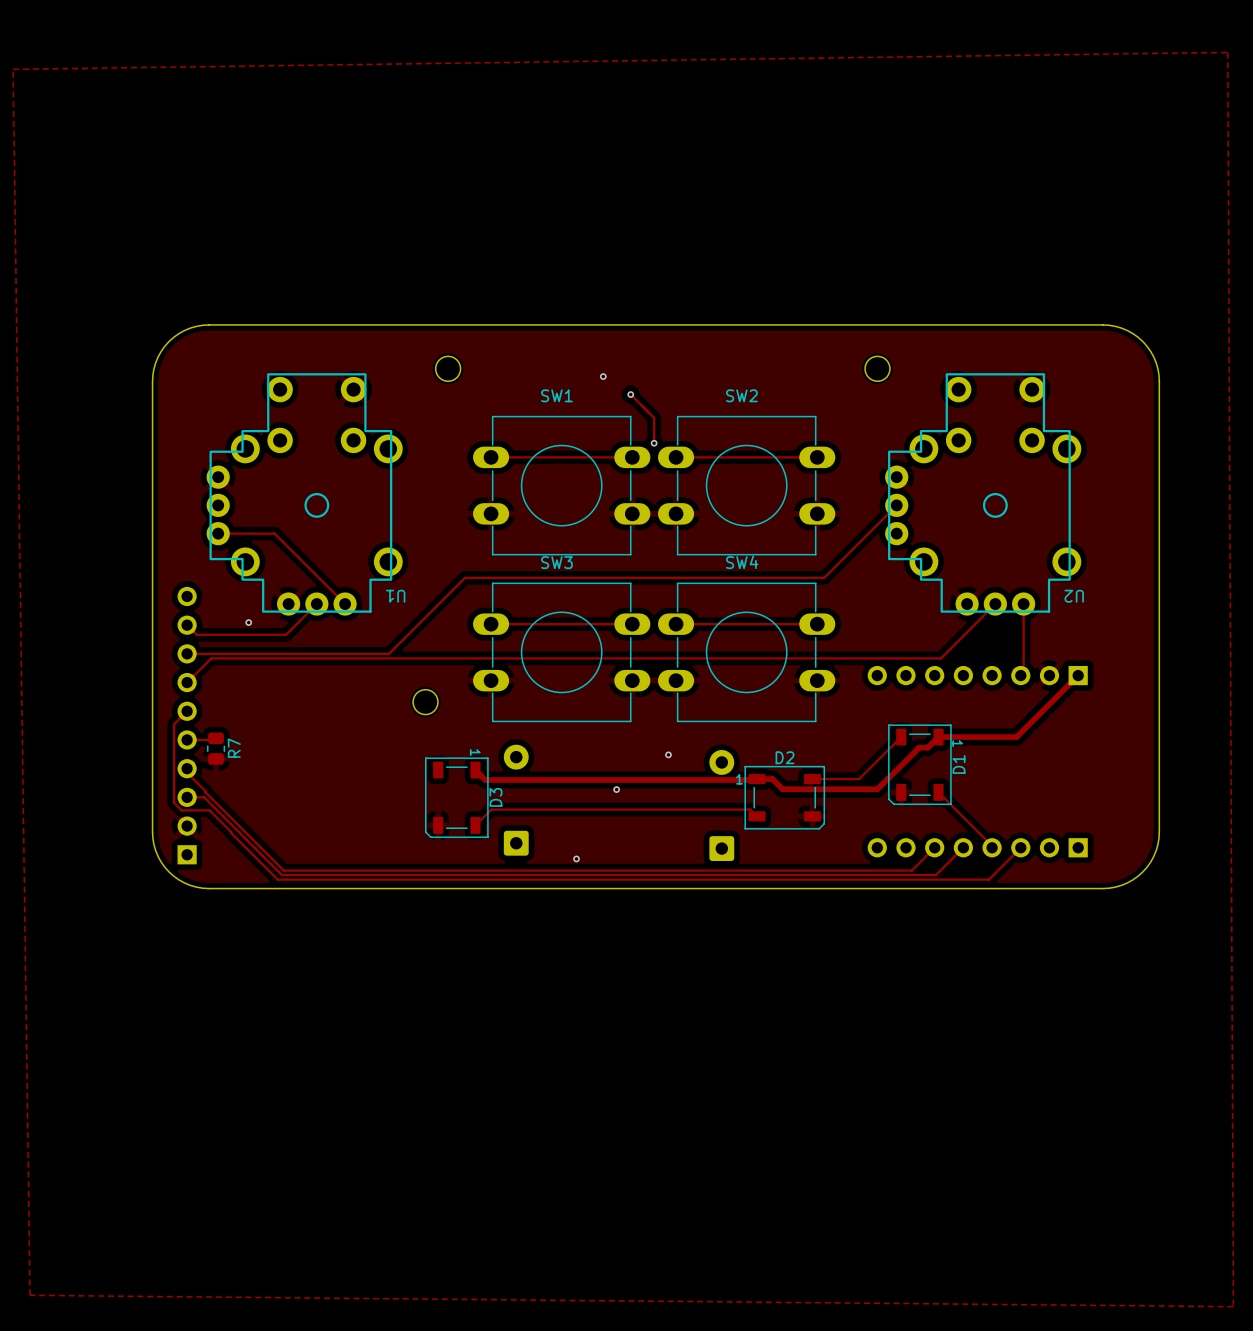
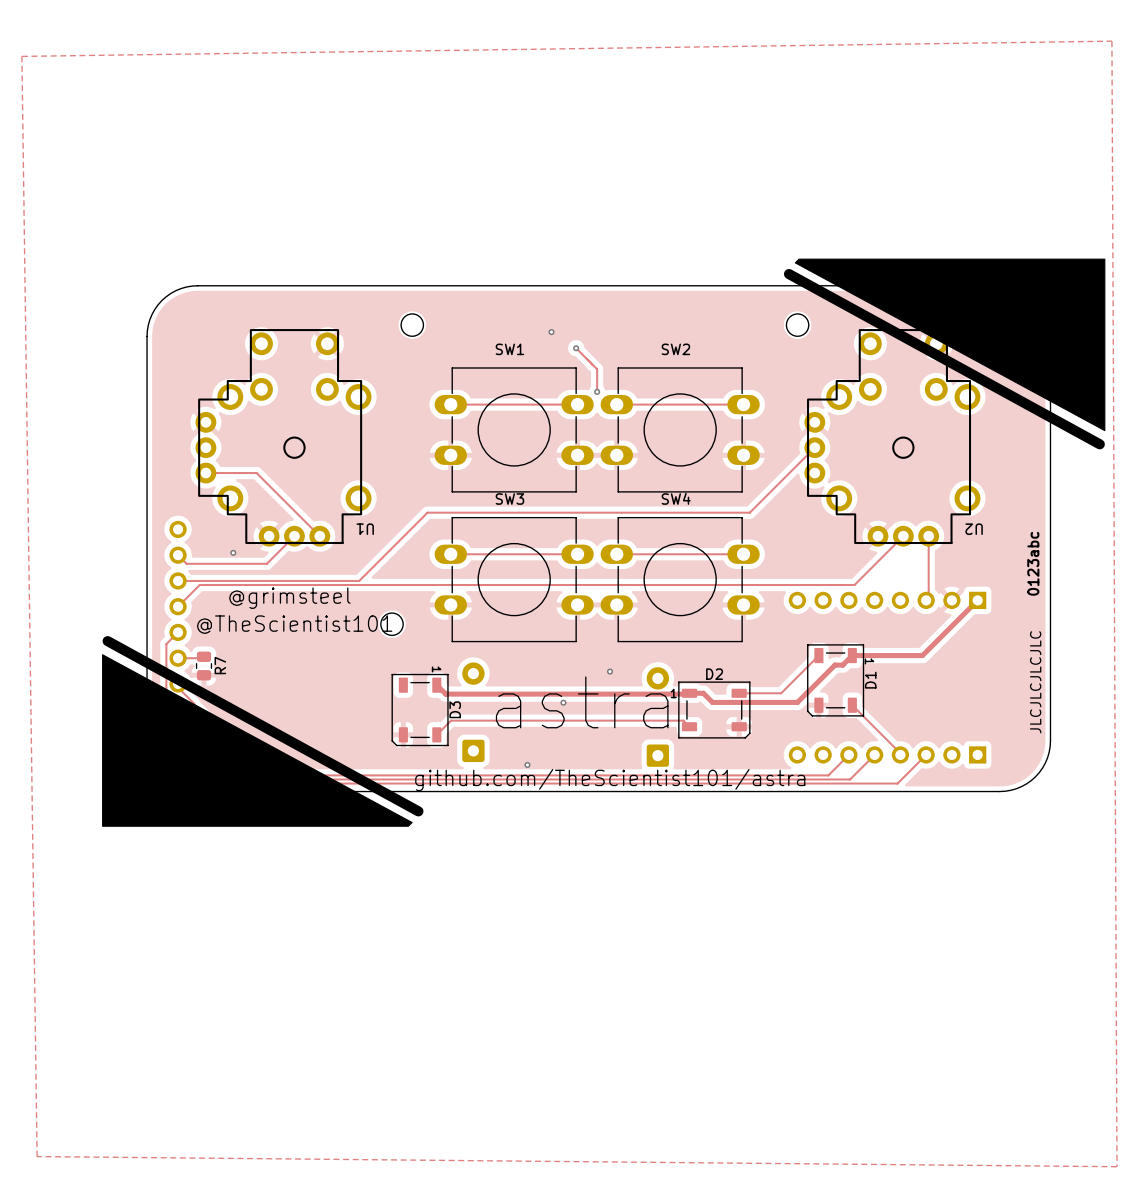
drawing: none -> [794, 258, 1106, 432]
line: none -> (789, 274) (1099, 444)
text: none -> 0123abc (1033, 563)
text: none -> @grimsteel (289, 598)
text: none -> @TheScientist101 (294, 624)
line: none -> (107, 641) (418, 811)
drawing: none -> [102, 654, 413, 827]
text: none -> JLCJLCJLCJLC (1035, 682)
text: none -> astra (582, 702)
text: none -> github.com/TheScientist101/astra (610, 780)

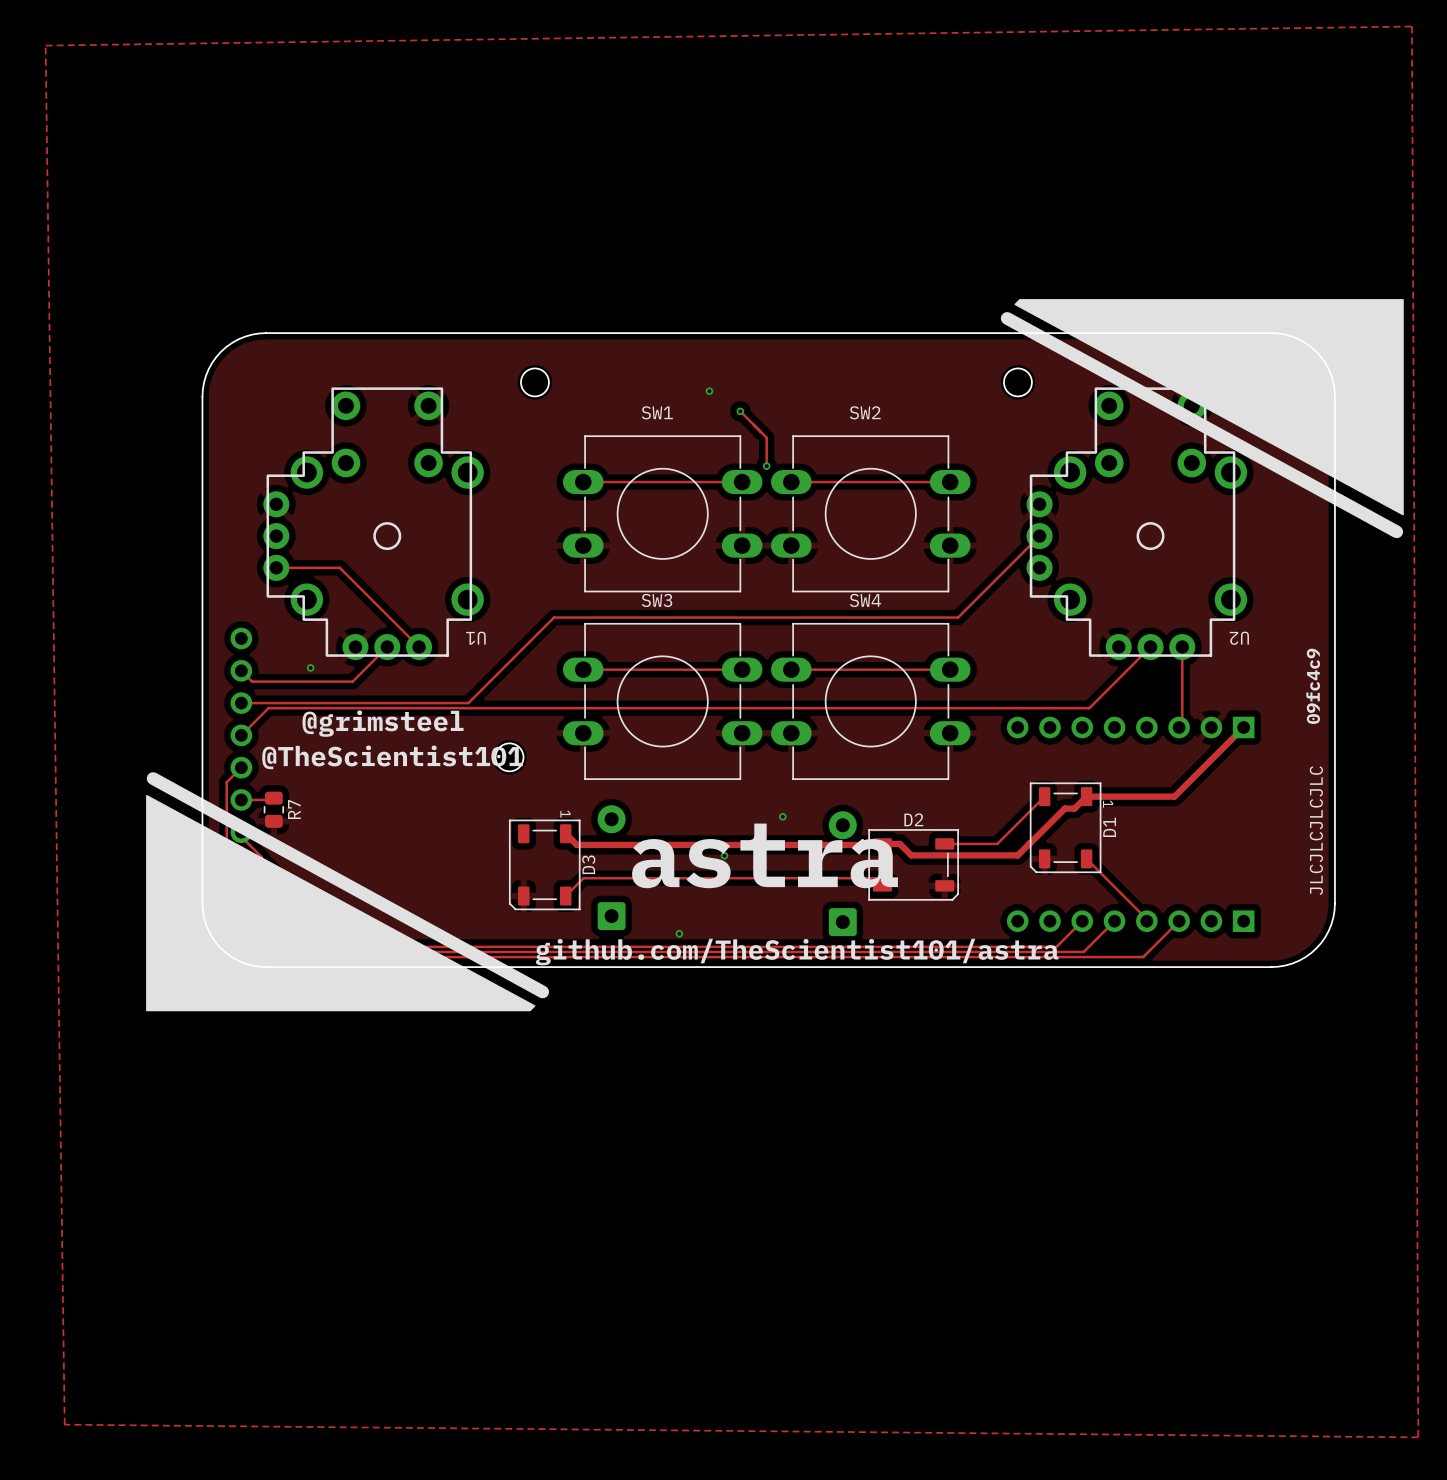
text: 0123abc (1033, 563) -> 09fc4c9 (1313, 686)

